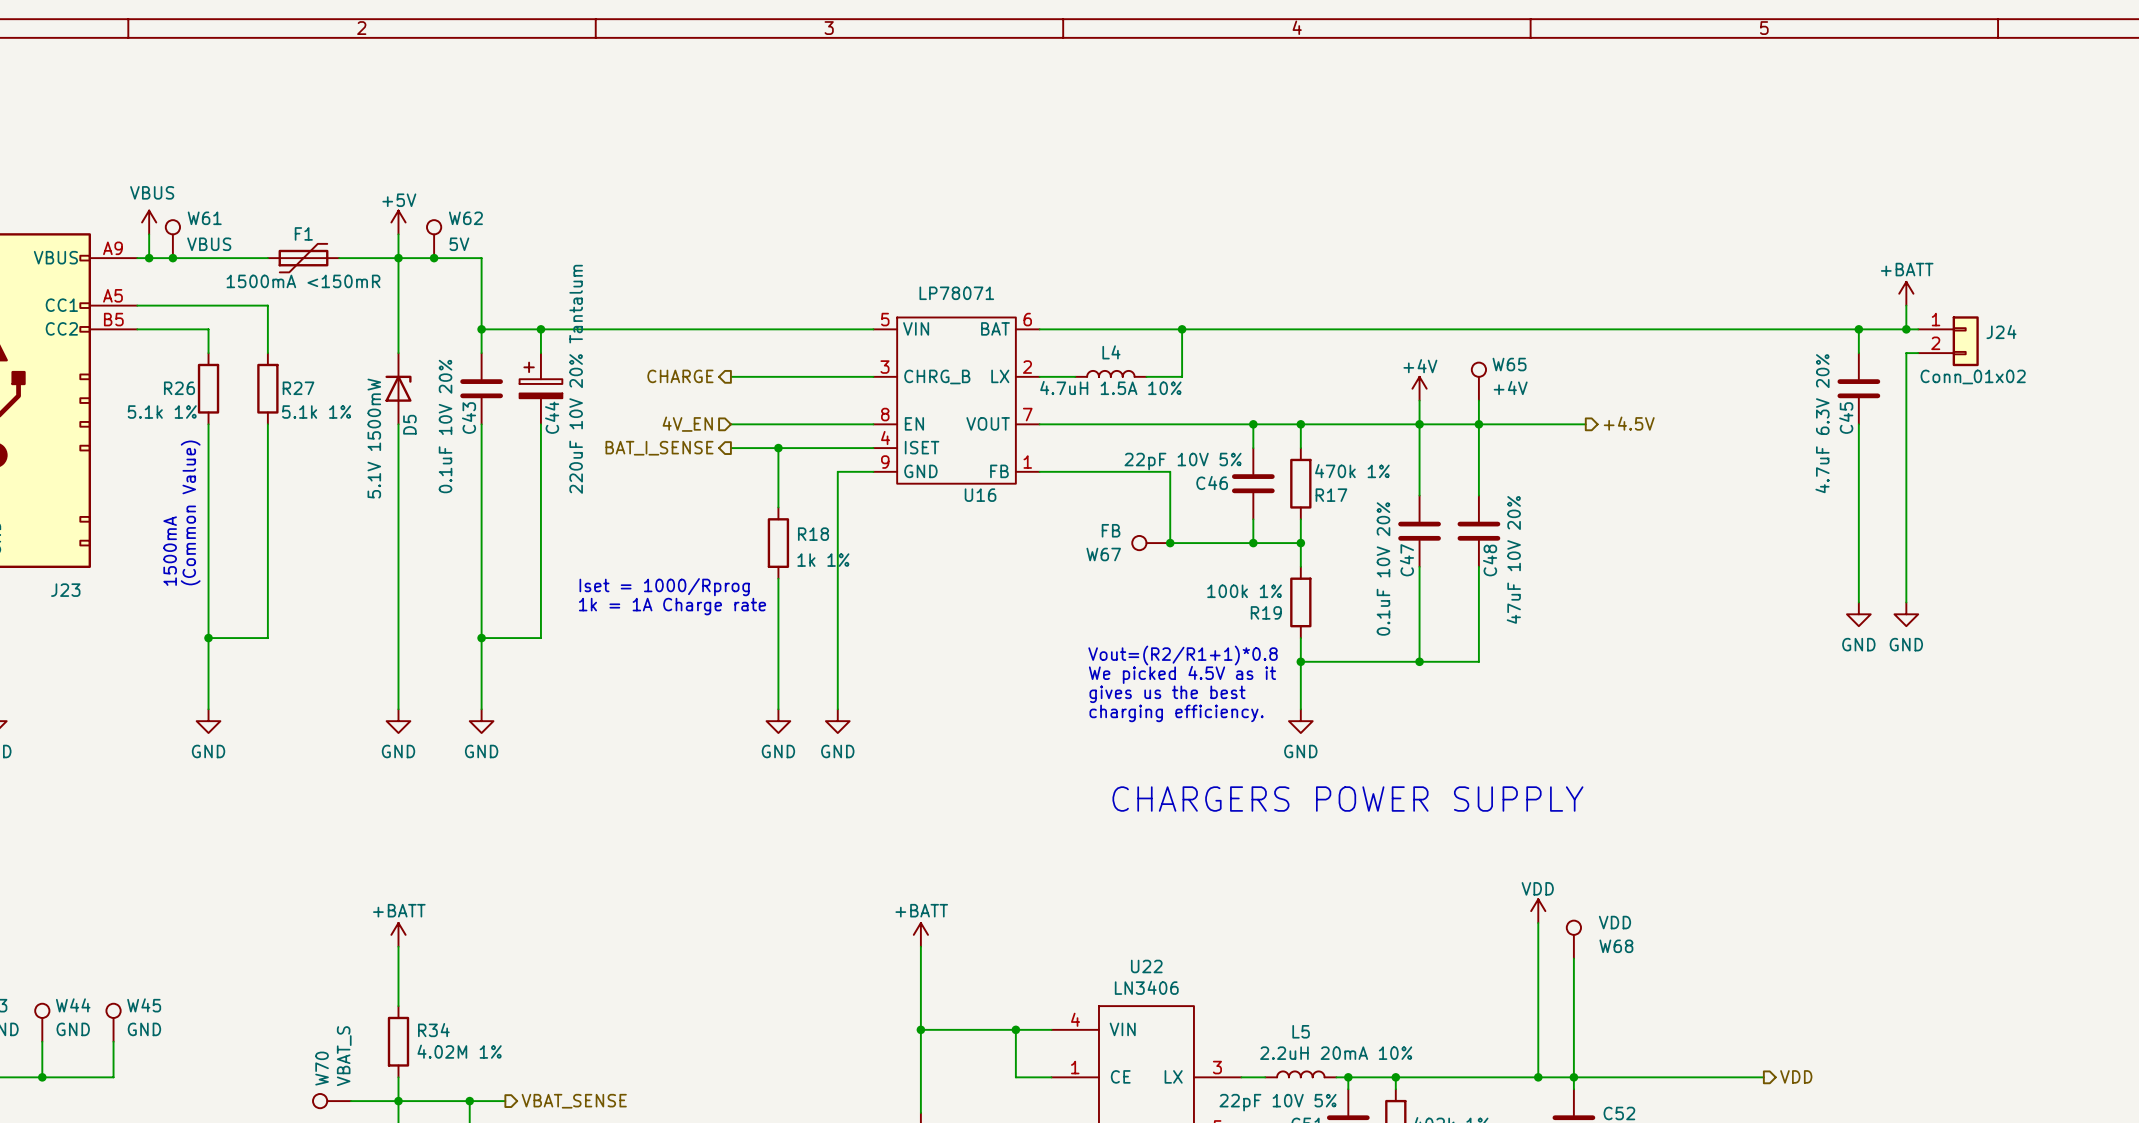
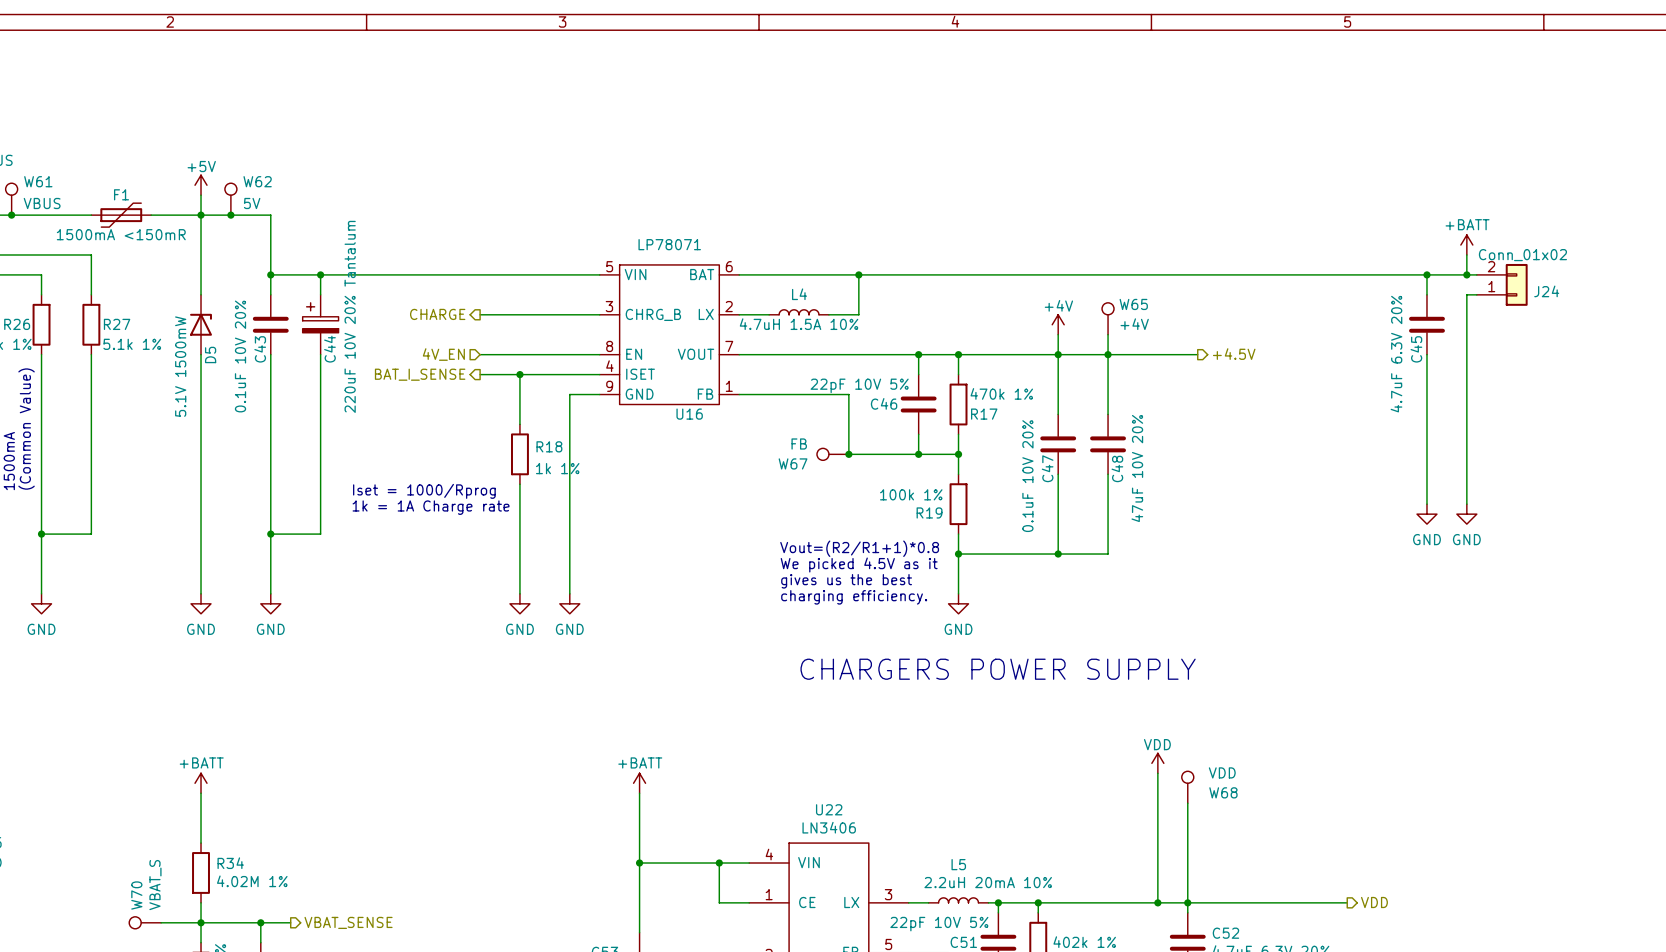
J24 flip: as is (1965, 341) -> up-down (1516, 284)

